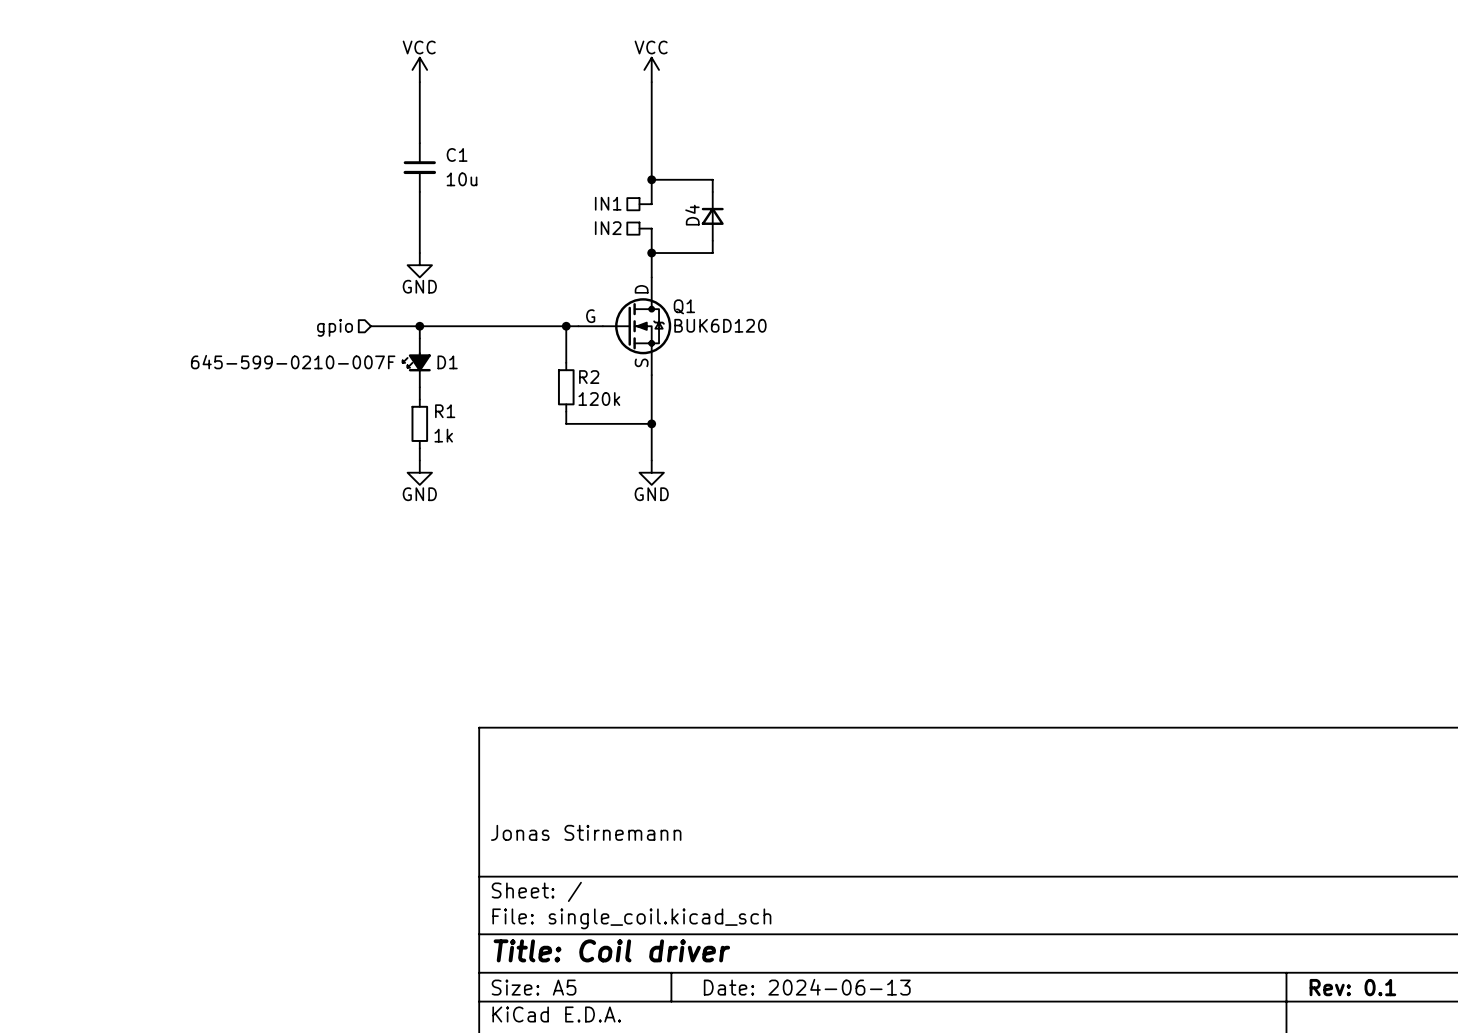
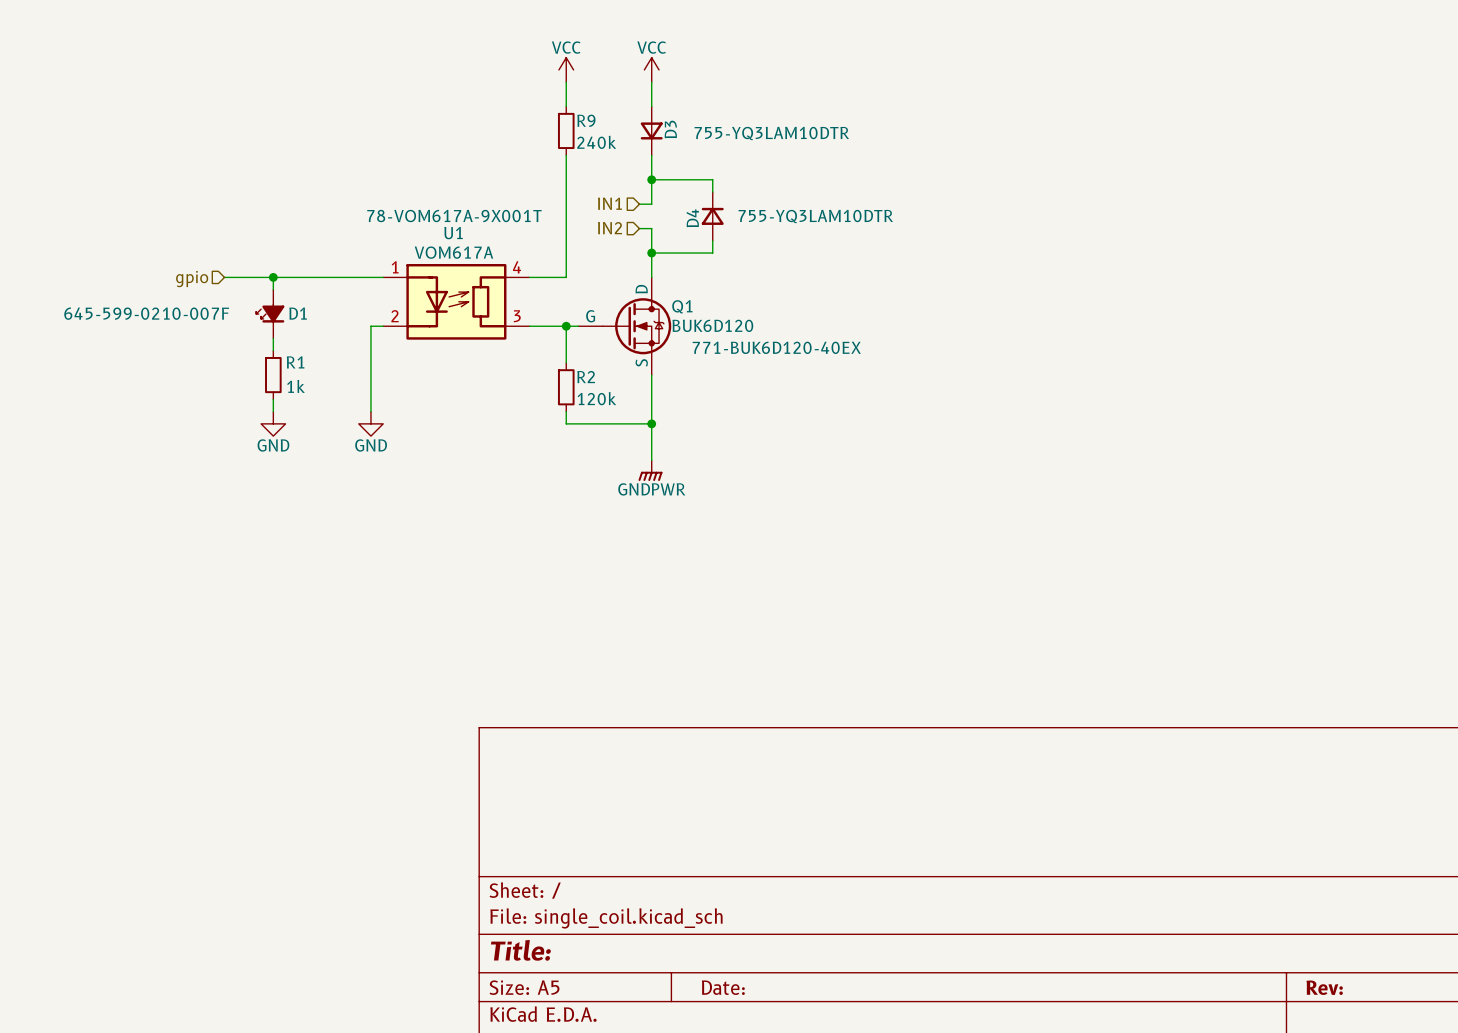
power symbol position: VCC (419, 69) -> VCC (566, 69)
wire: (419, 82) (419, 143) -> none
wire: none -> (566, 82) (566, 106)
R9: none -> 240k (566, 130)
D3: none -> (651, 130)
wire: none -> (566, 155) (566, 277) (529, 277)
C1: 10u (419, 167) -> none
wire: (419, 191) (419, 253) -> none
hierarchical label shape: passive (608, 203) -> input (609, 203)
D4 text: none -> 755-YQ3LAM10DTR (815, 216)
hierarchical label shape: passive (608, 228) -> input (610, 228)
power symbol: GND (419, 265) -> none
wire: none -> (224, 277) (383, 277)
junction: none -> (273, 277)
U1: none -> VOM617A (456, 301)
wire: none -> (370, 326) (370, 411)
junction: (419, 326) -> none
hierarchical label position: gpio (335, 327) -> gpio (192, 279)
Q1 text: none -> 771-BUK6D120-40EX (776, 347)
D1 position: (416, 362) -> (270, 314)
wire: (419, 387) (419, 399) -> (273, 338) (273, 350)
power symbol: none -> GND (273, 423)
R1 position: (419, 423) -> (273, 375)
wire: (419, 448) (419, 460) -> (273, 399) (273, 411)
power symbol position: GND (419, 472) -> GND (370, 423)
power symbol: GND (651, 472) -> GNDPWR (650, 470)
title block: Jonas Stirnemann (586, 832) -> none
title block: Title: Coil driver (611, 950) -> Title: (520, 950)
title block: Date: 2024-06-13 (807, 987) -> Date: (723, 987)
title block: Rev: 0.1 (1352, 987) -> Rev: (1324, 987)

